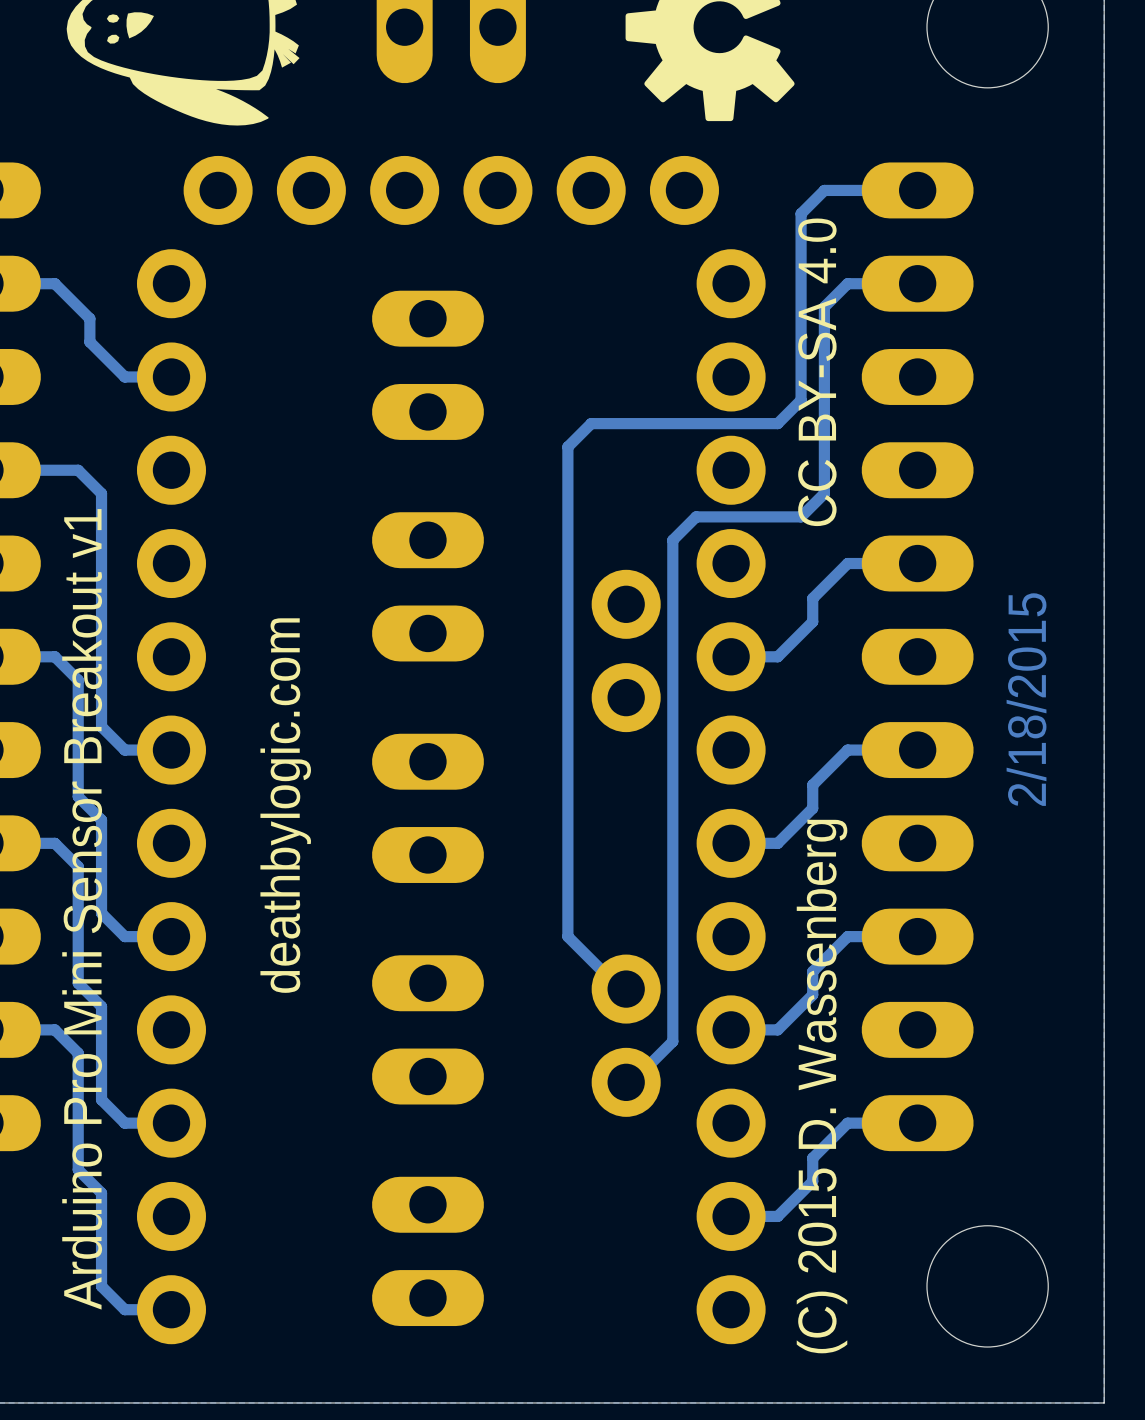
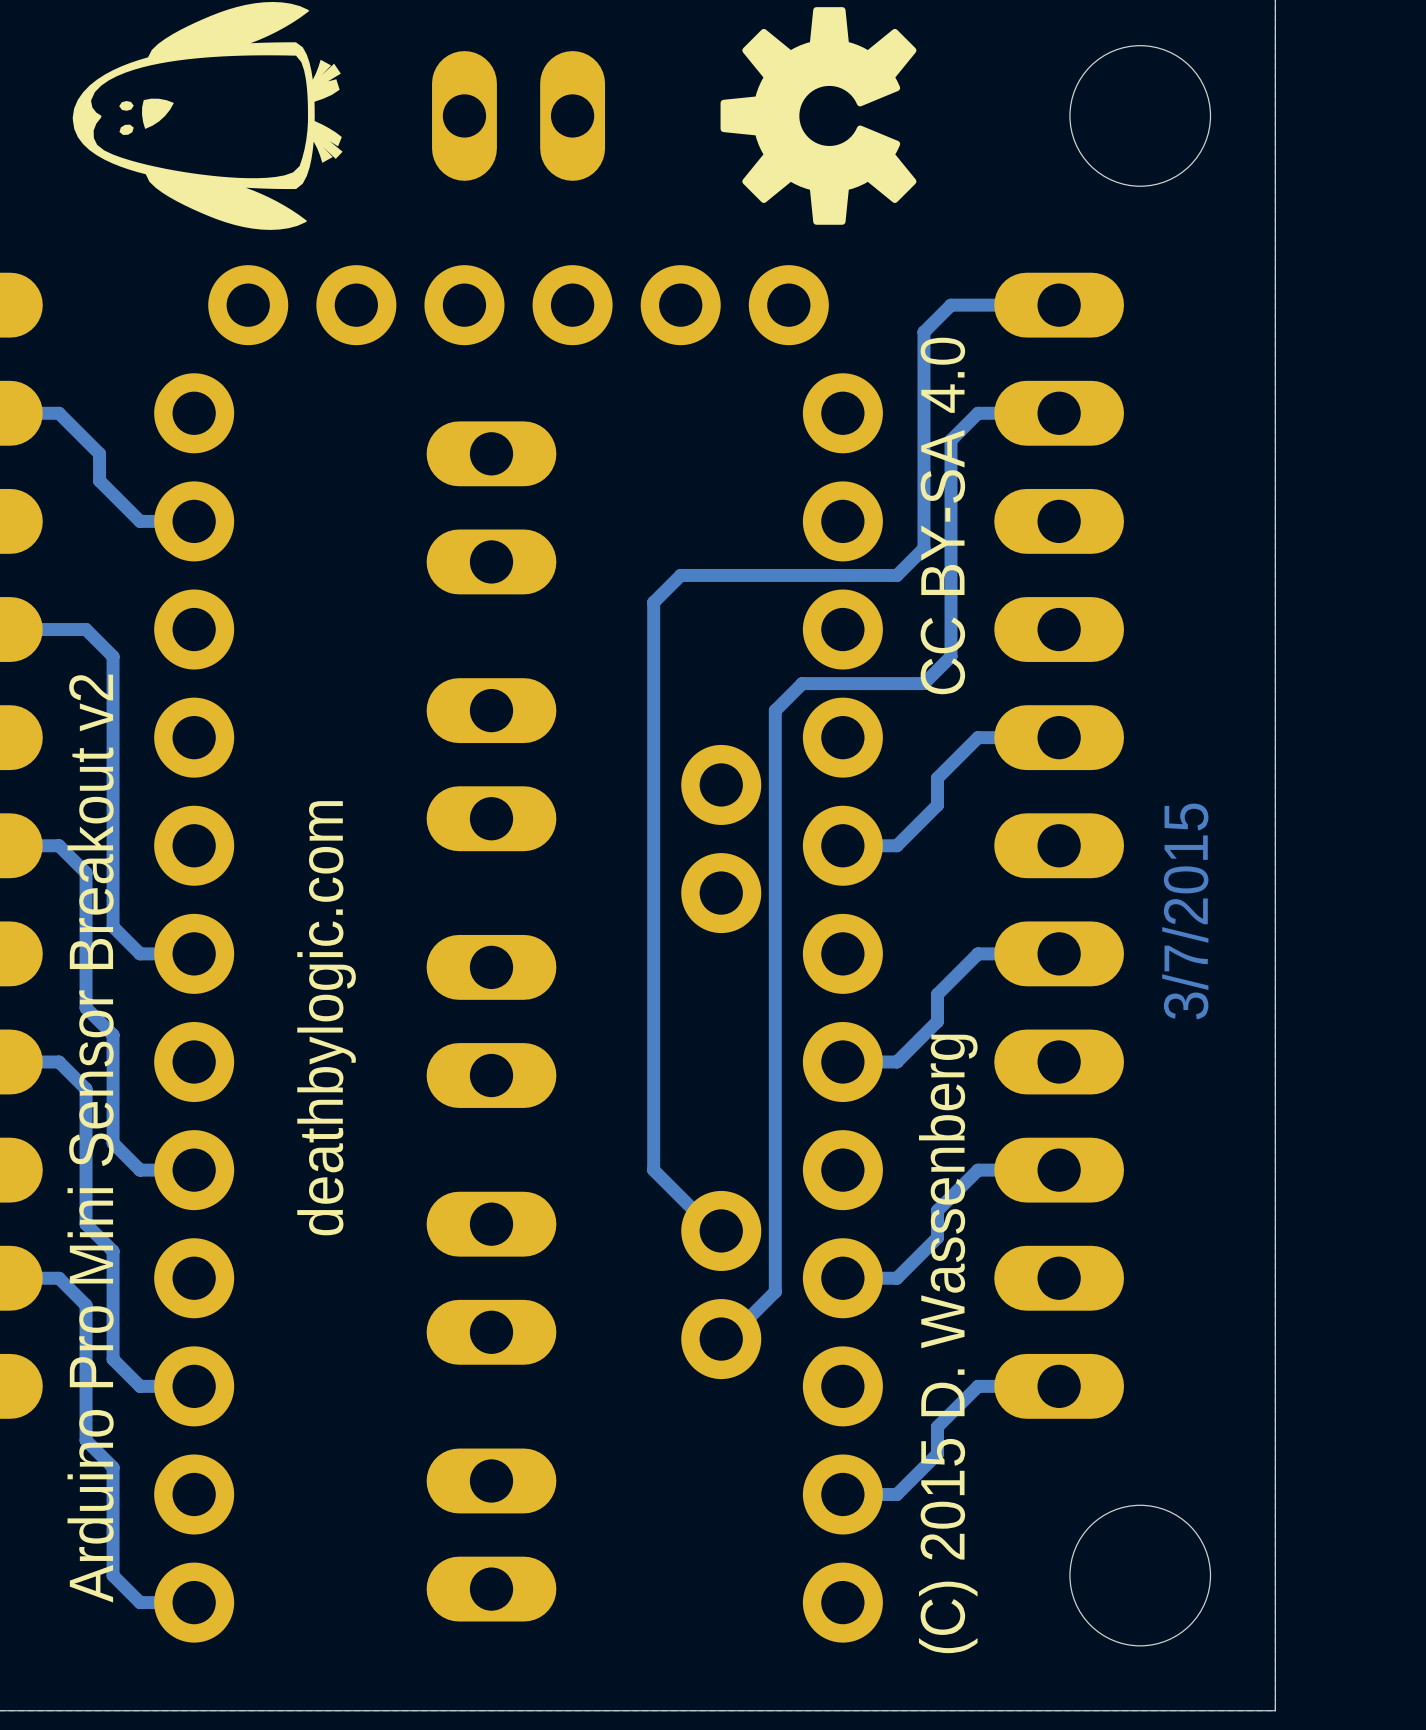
text: 2/18/2015 (1026, 699) -> 3/7/2015 (1185, 911)
text: Arduino Pro Mini Sensor Breakout v1 (82, 909) -> Arduino Pro Mini Sensor Breakout v2 (90, 1138)

